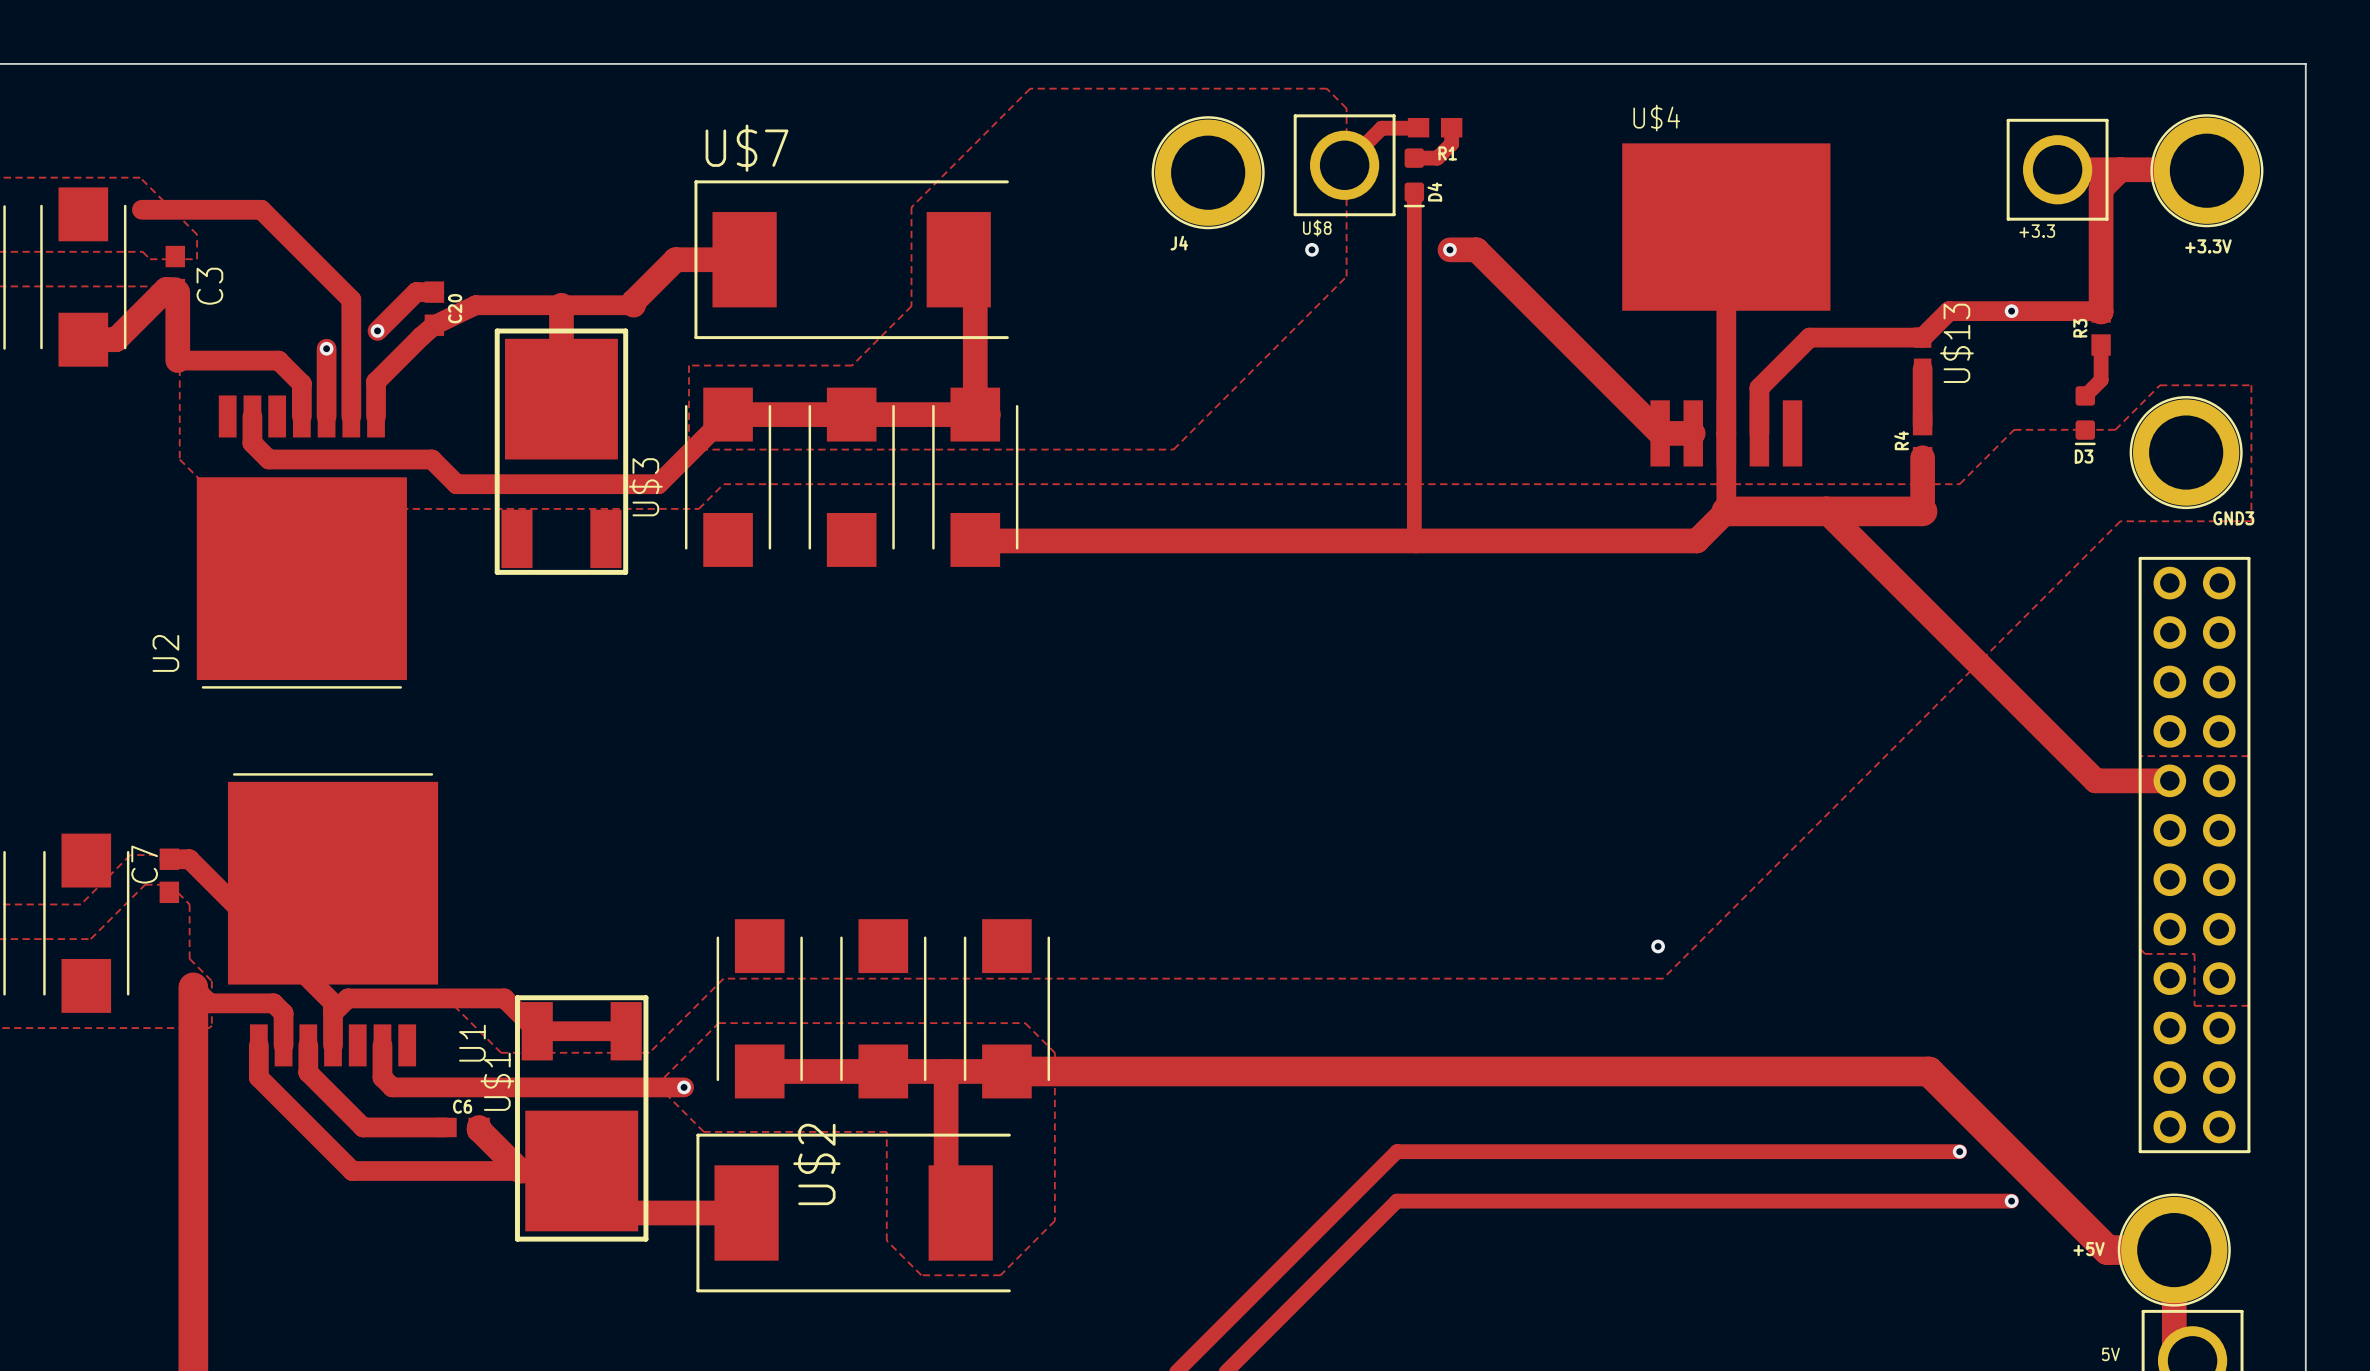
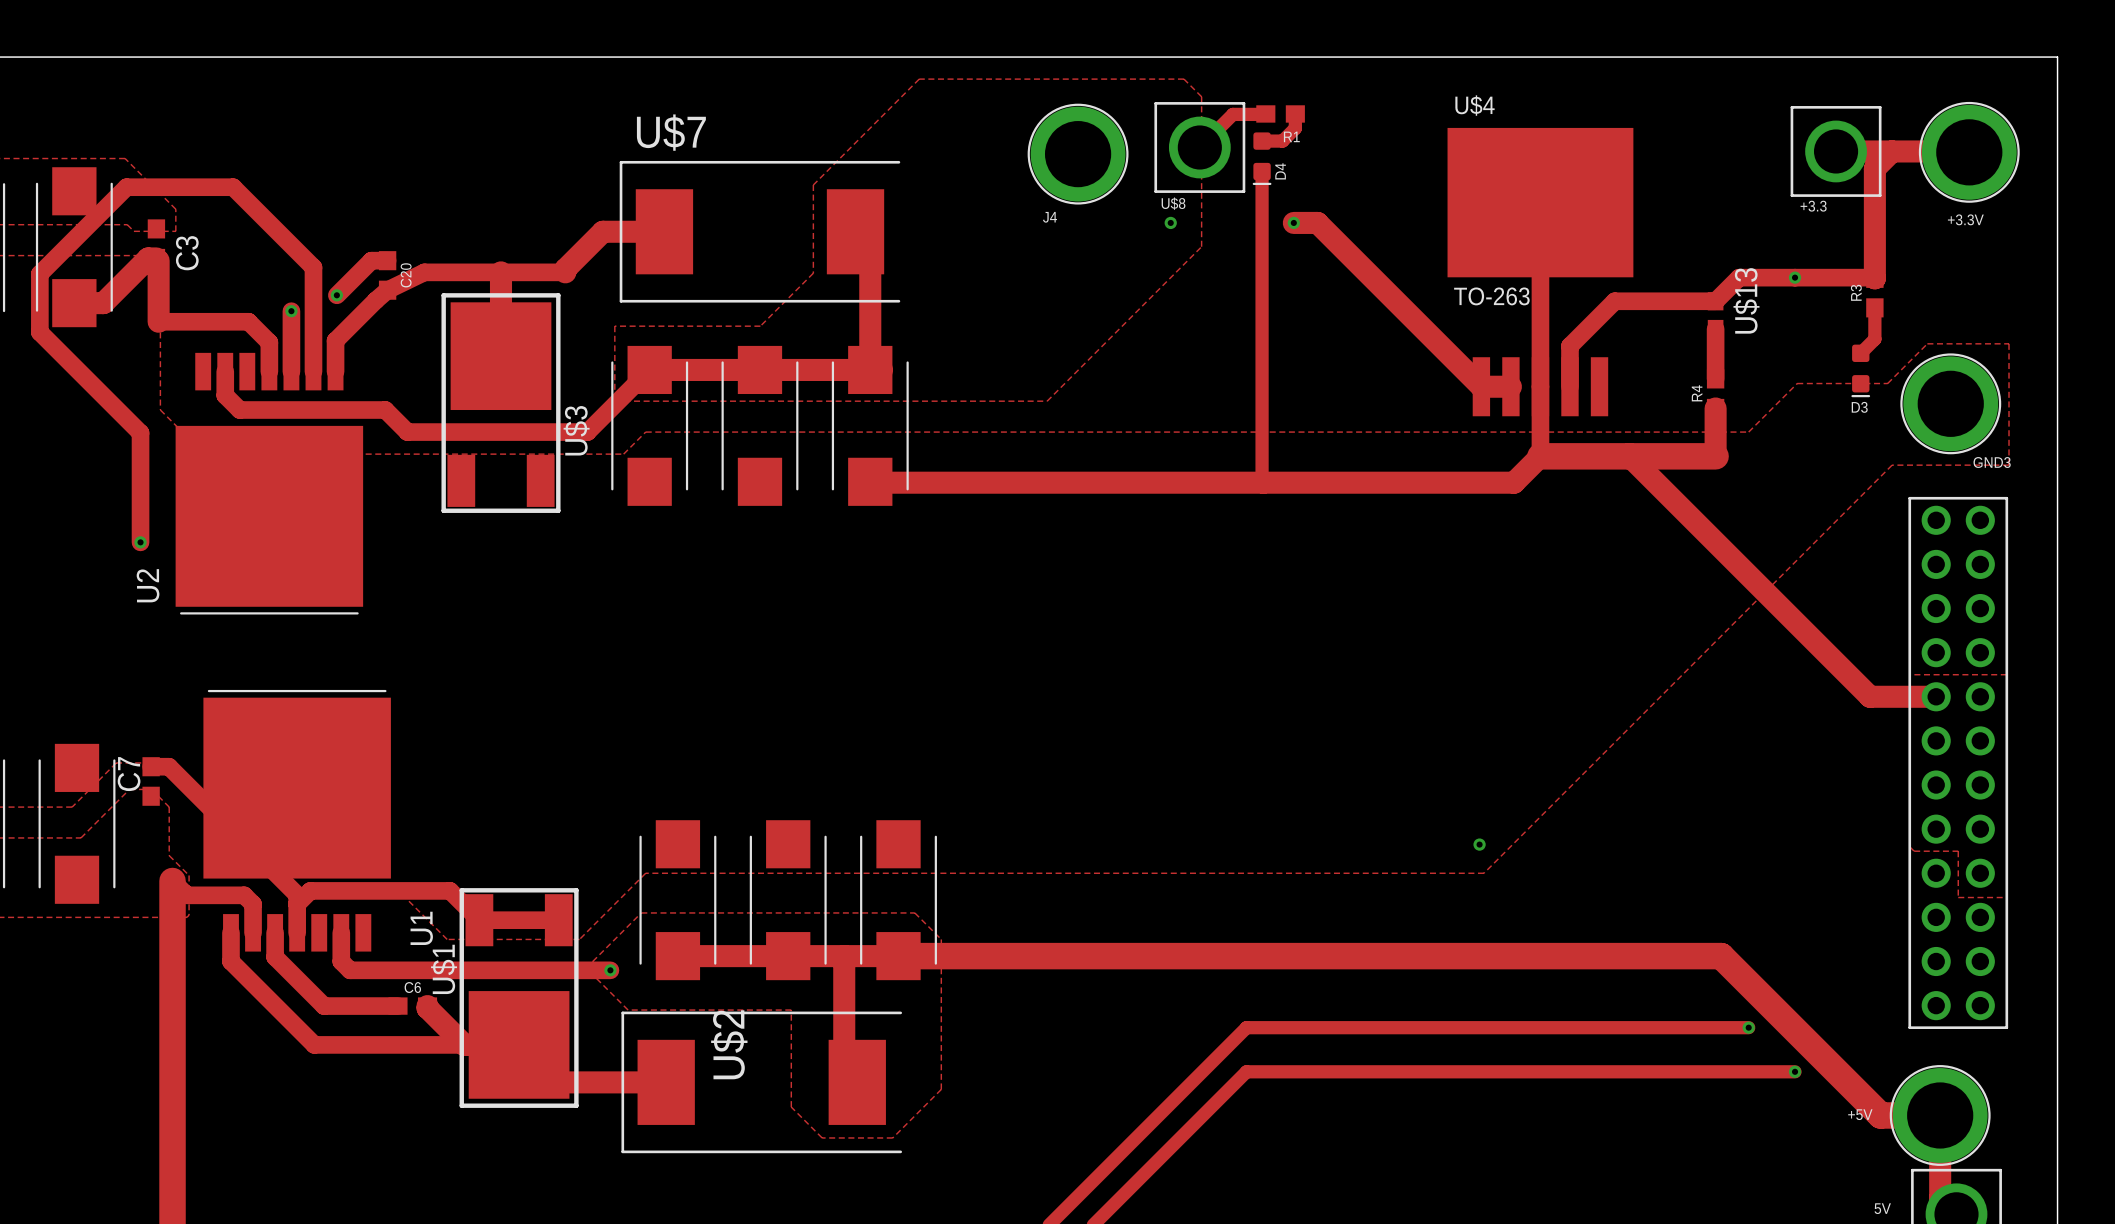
track: none -> (126, 187) (39, 273) (39, 332) (140, 432) (140, 542)
U$4 value: none -> TO-263 (1491, 296)
via: none -> (140, 542)

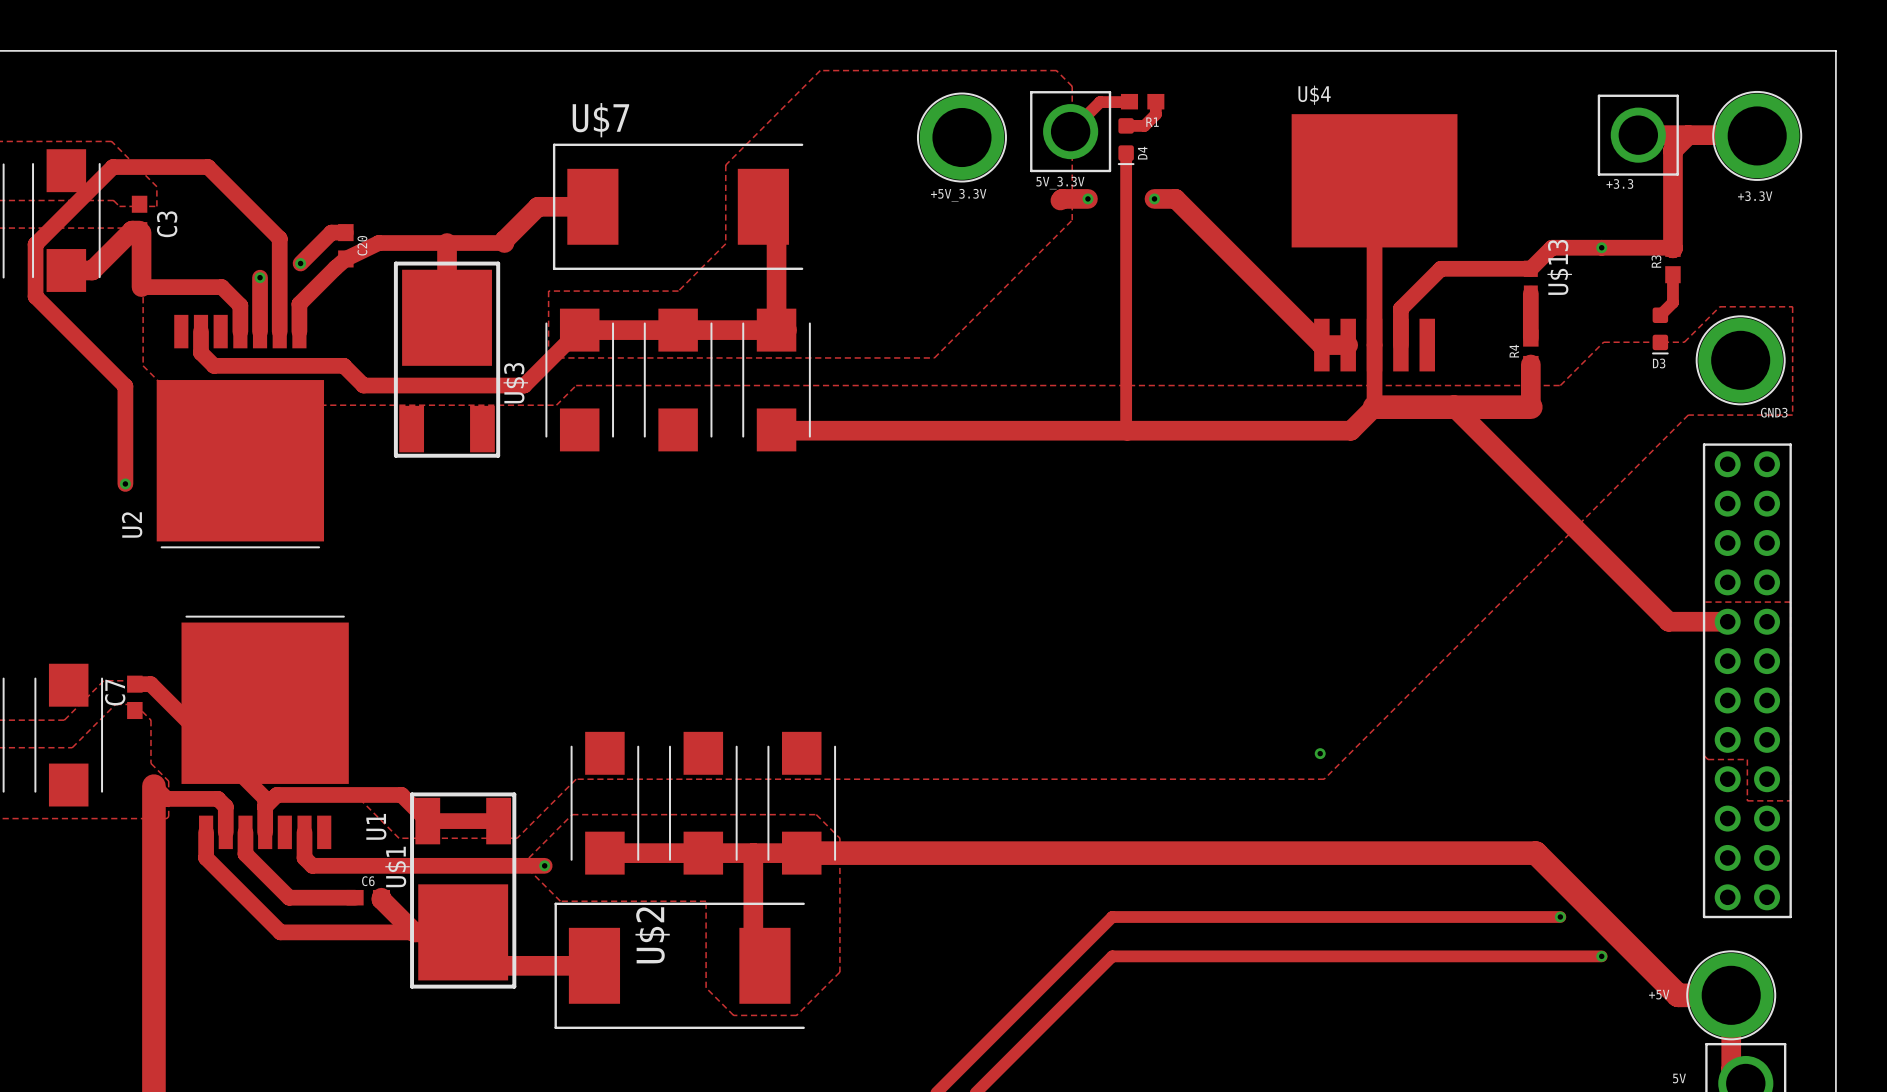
U$8 name: U$8 (1173, 203) -> 5V_3.3V (1060, 183)
J4 name: J4 (1050, 217) -> +5V_3.3V (958, 195)
via position: (1170, 222) -> (1087, 198)
track: none -> (1087, 198) (1060, 200)
U$4 value: TO-263 (1491, 296) -> none

